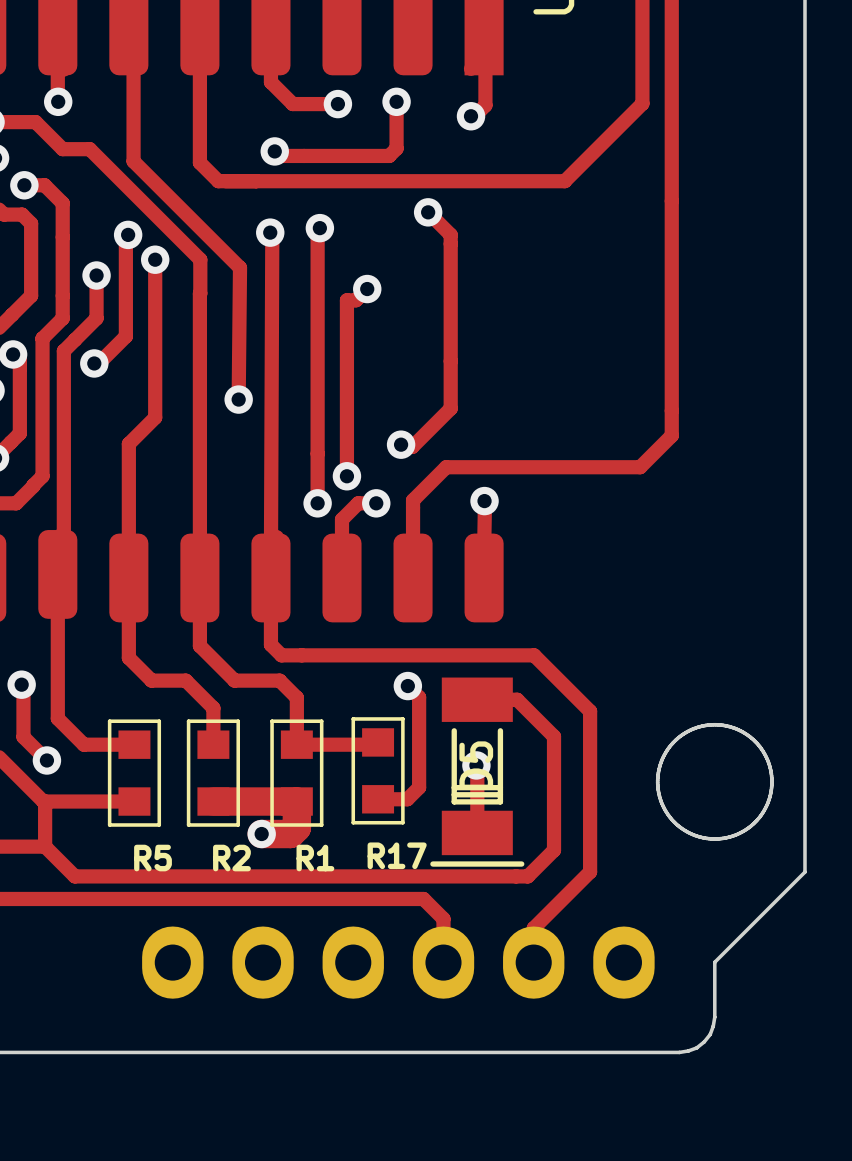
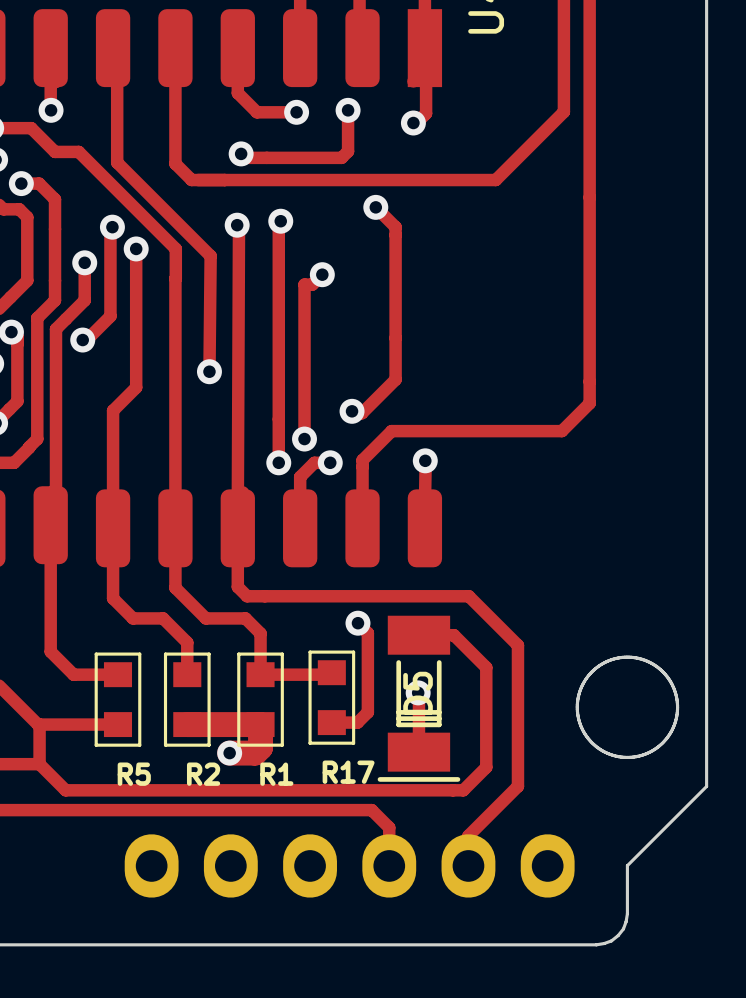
track: (21, 684) (23, 686) (23, 737) (46, 760) -> none
via: (21, 684) -> none
via: (46, 760) -> none

